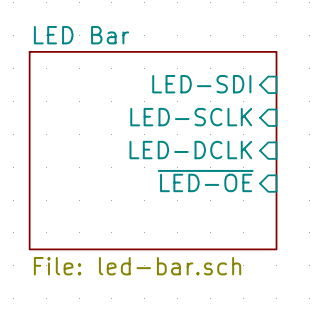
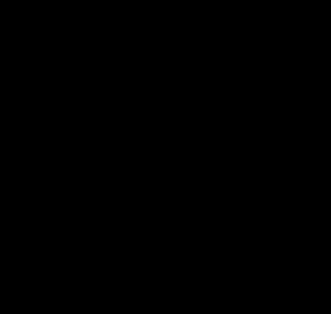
sheet pin: LED-SDI (201, 84) -> none
sheet pin: LED-SCLK (191, 117) -> none
sheet LED Bar: File: led-bar.sch (153, 150) -> none
sheet pin: LED-DCLK (190, 150) -> none
sheet pin: ~{LED-OE} (205, 181) -> none

